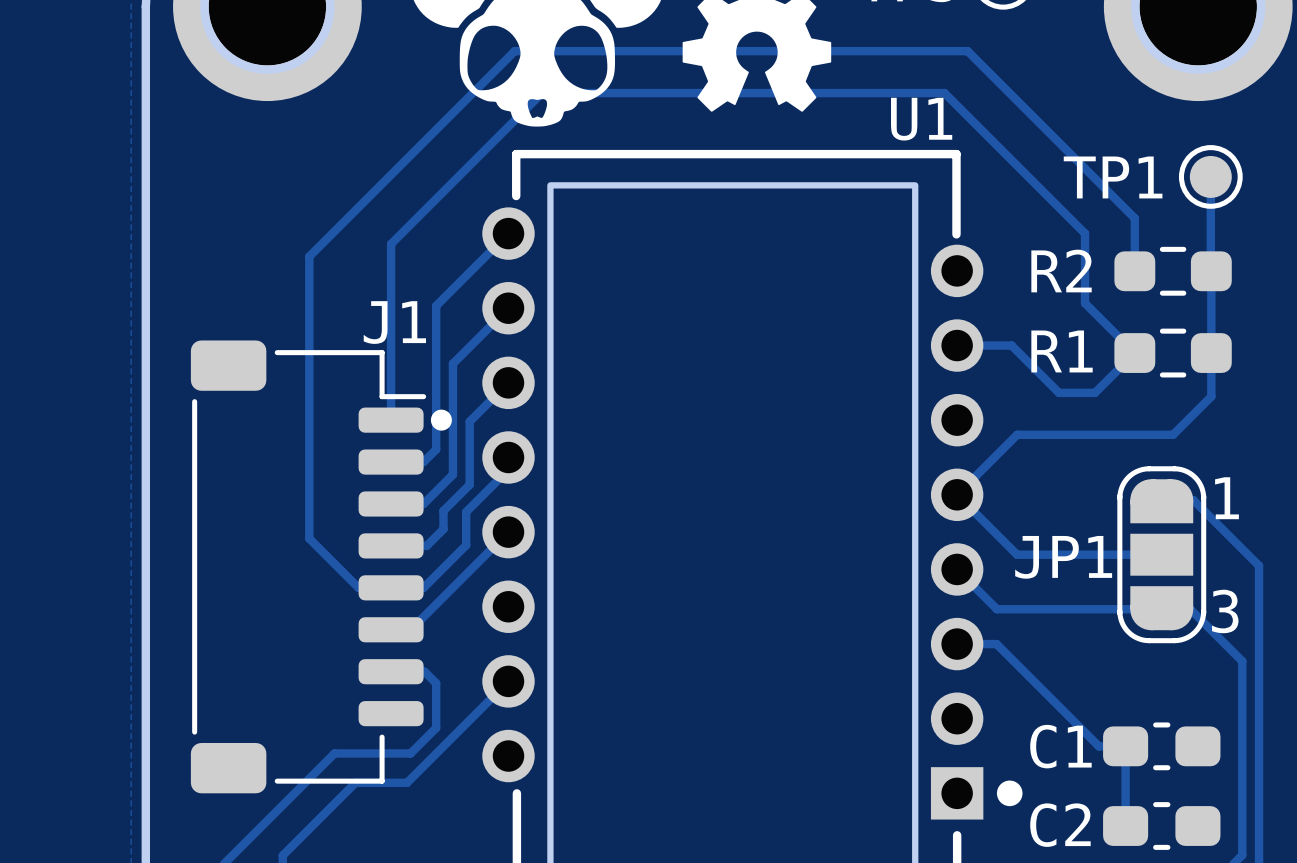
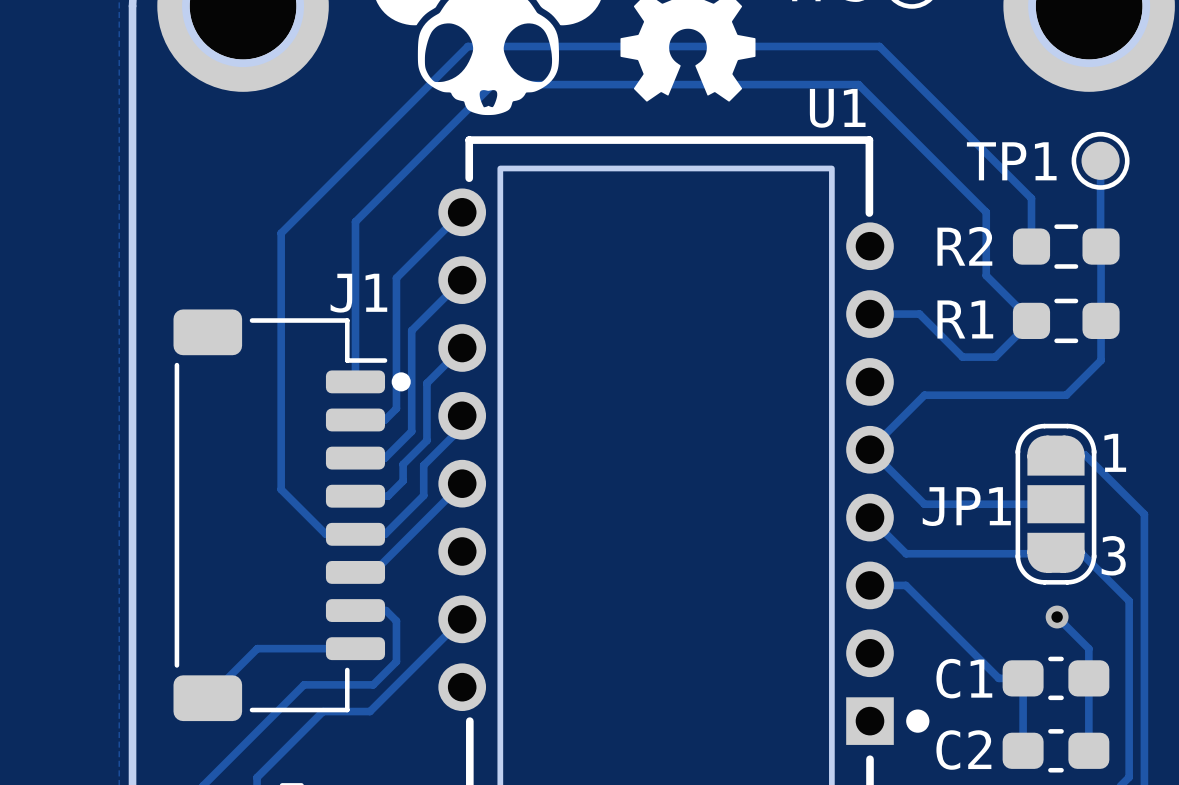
track: none -> (1057, 617) (1088, 648) (1088, 750)
via: none -> (1057, 617)
track: none -> (355, 648) (257, 648) (207, 698)

